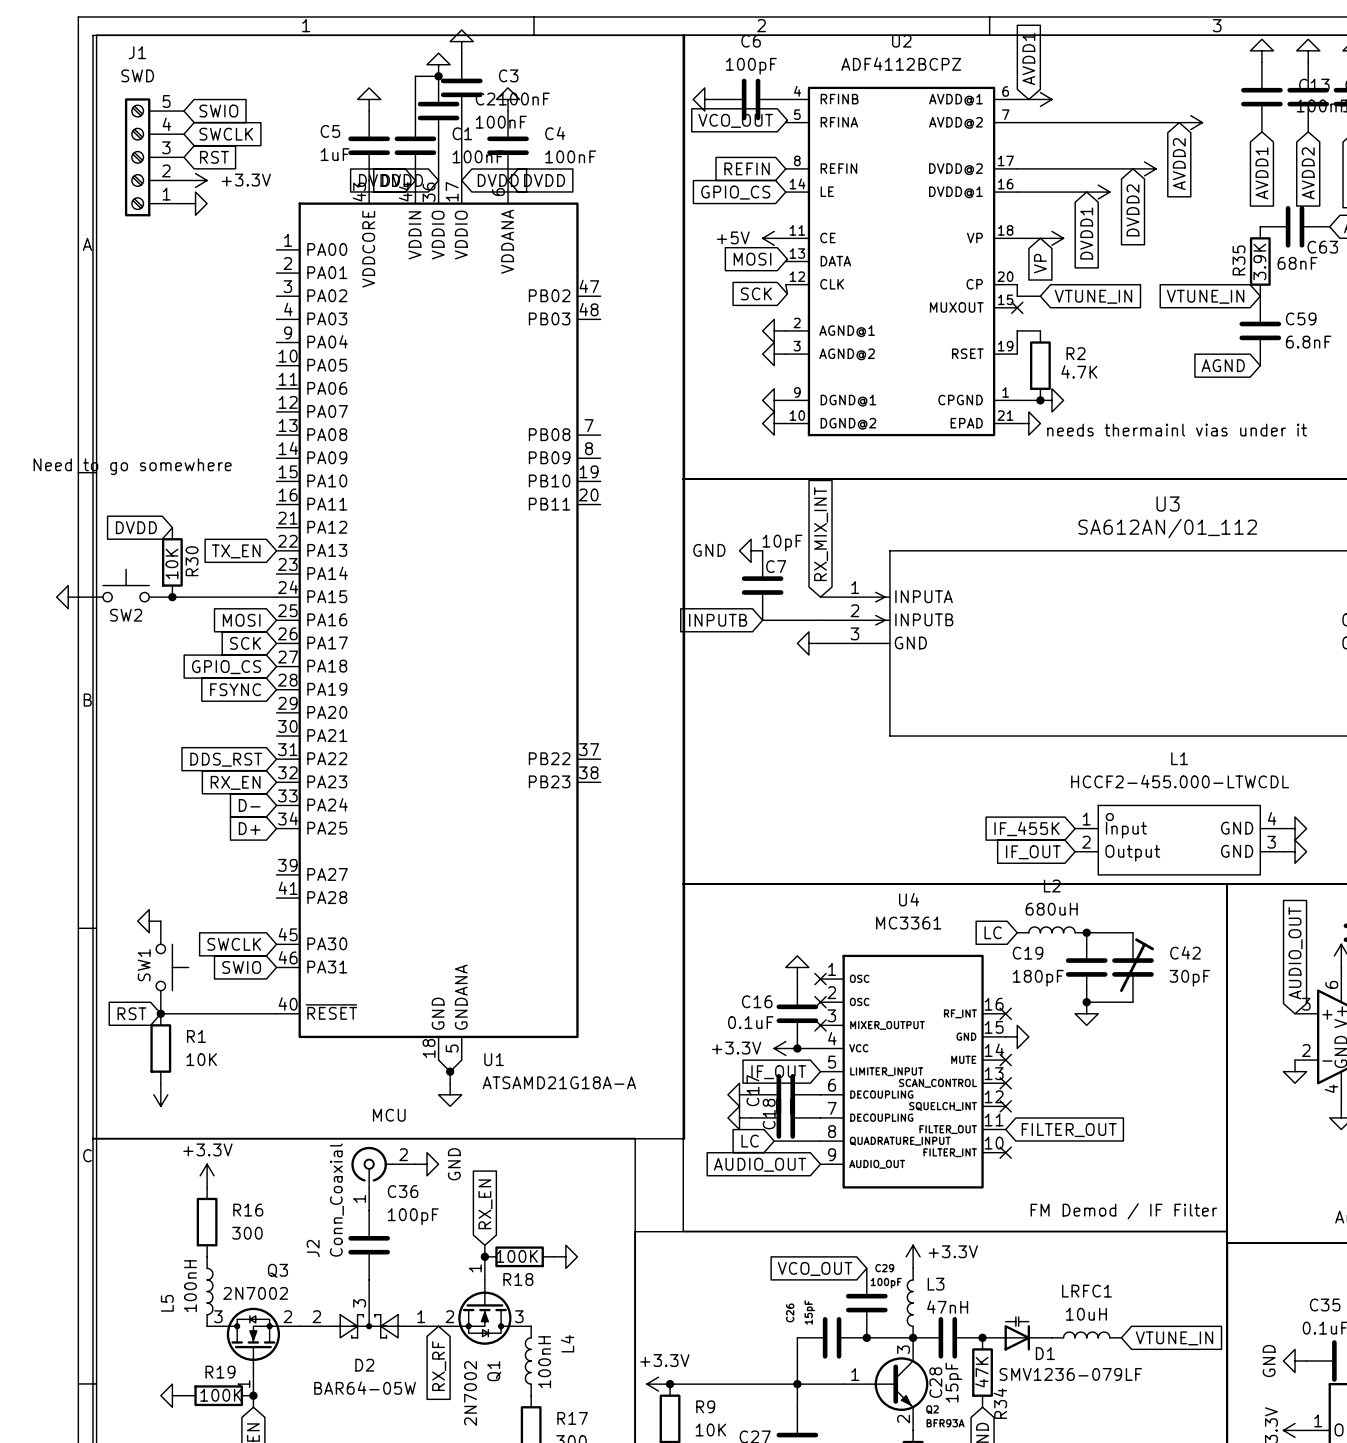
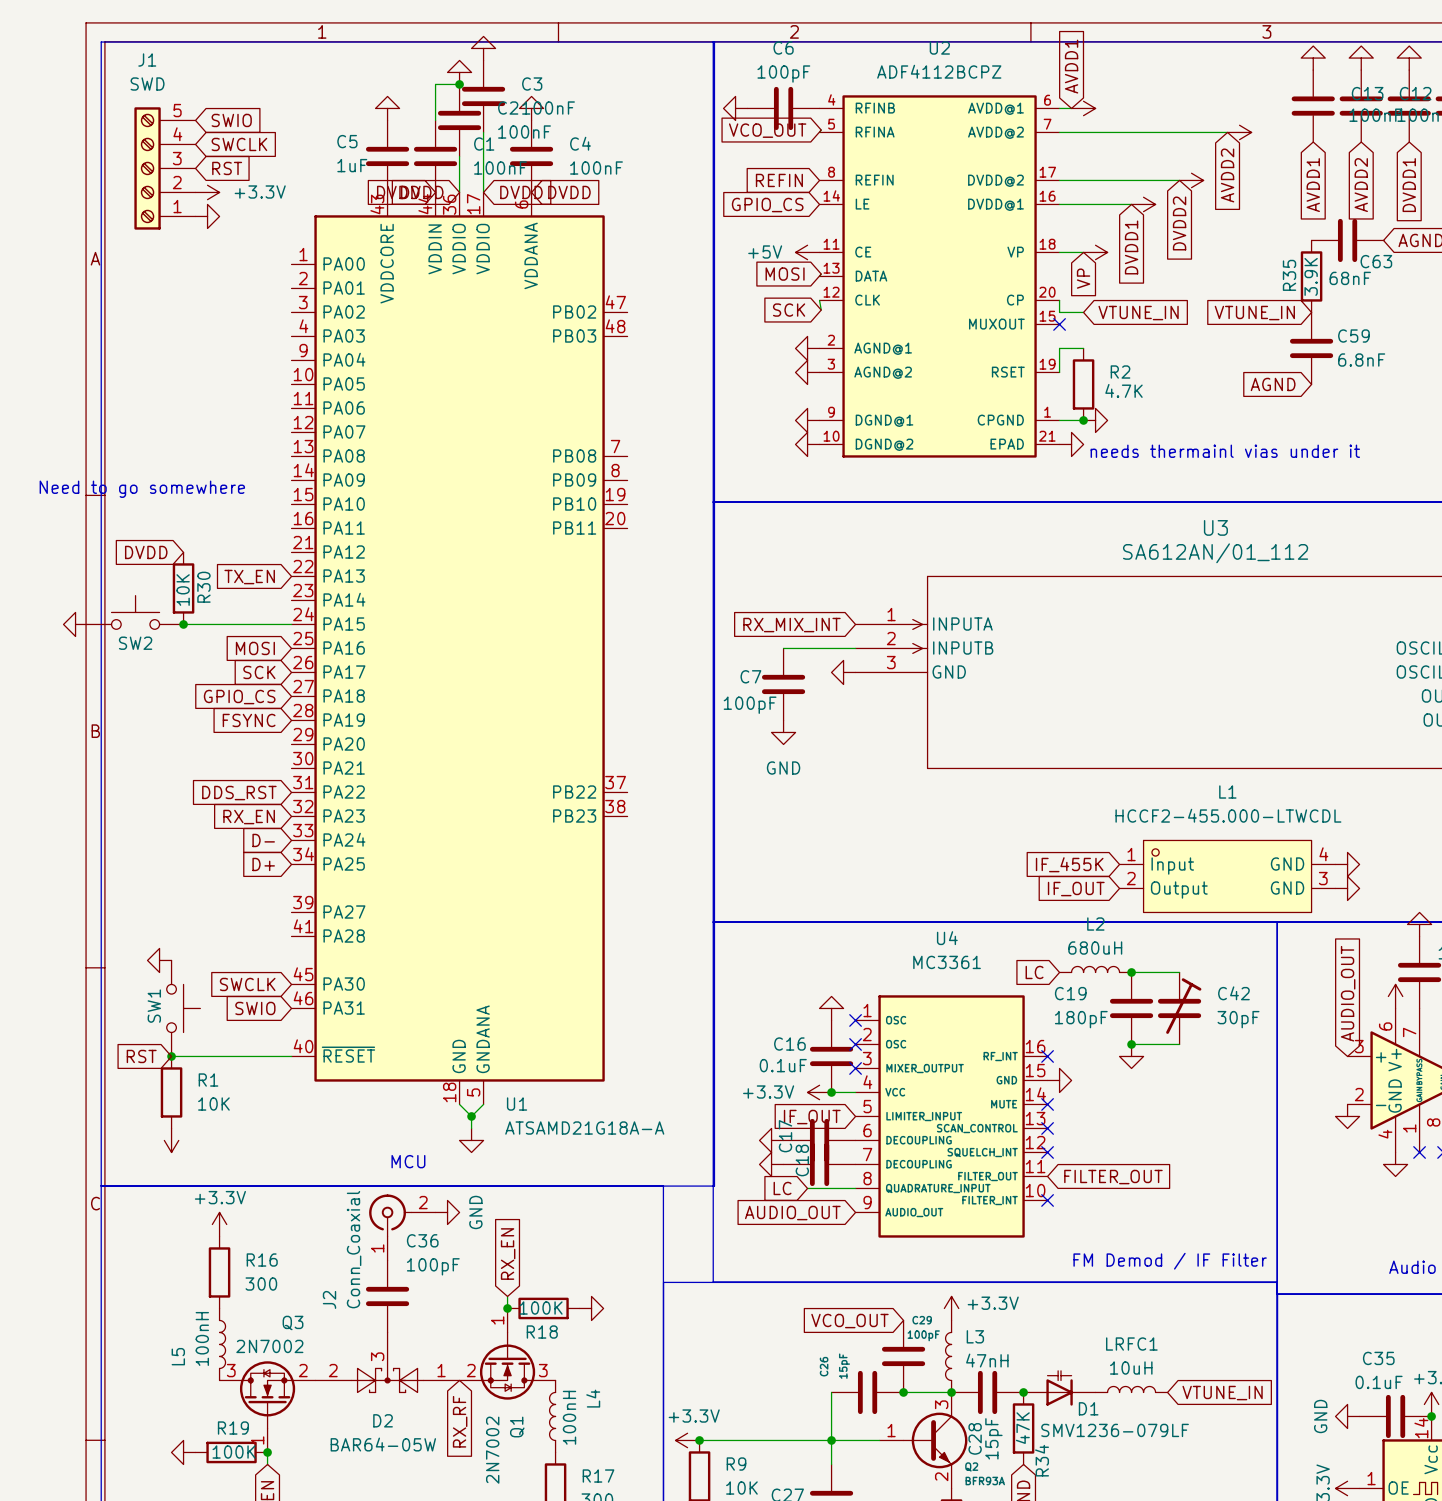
global label rotation: 0° (821, 534) -> 90° counterclockwise (791, 625)
C7 value: 10pF (782, 543) -> 100pF (750, 705)
power symbol rotation: 0° (751, 550) -> 90° counterclockwise (783, 732)
power symbol position: GND (751, 550) -> GND (783, 732)
C7 name position: C7 (776, 566) -> C7 (750, 676)
C7 position: (762, 585) -> (783, 684)
global label: INPUTB (718, 620) -> none
wire: none -> (783, 648) (795, 648)

